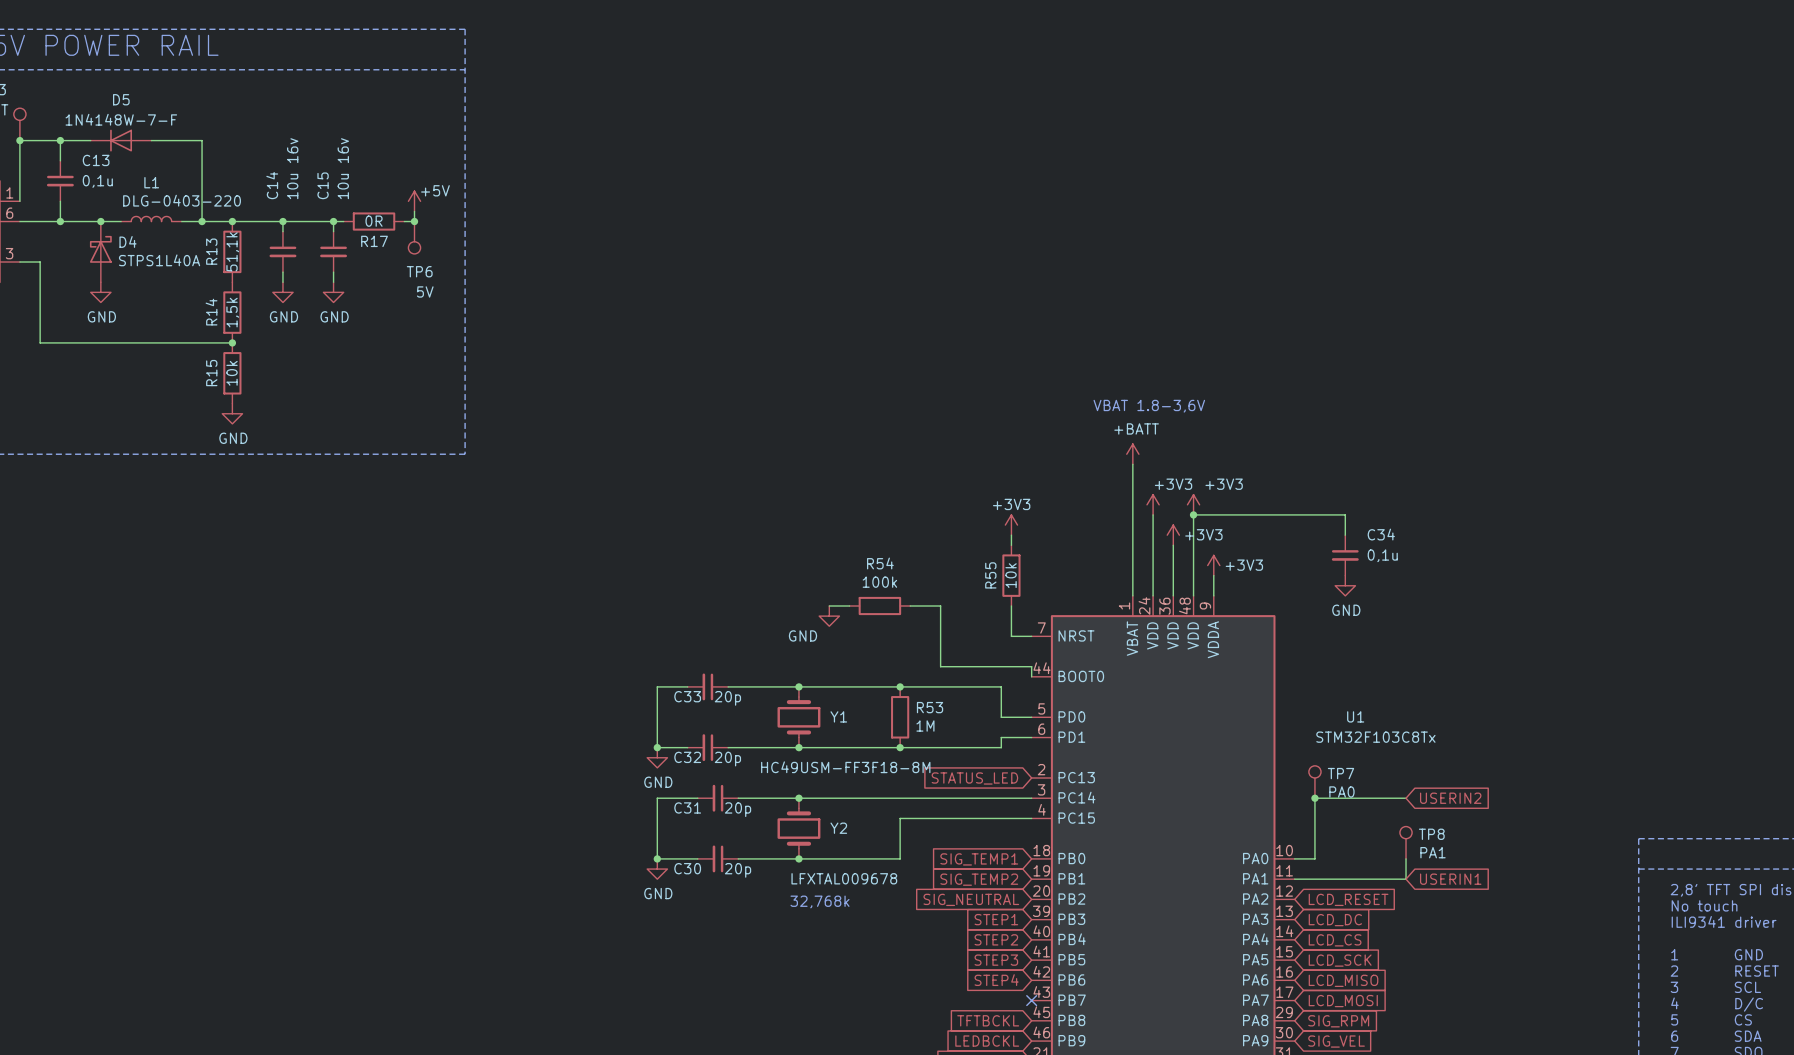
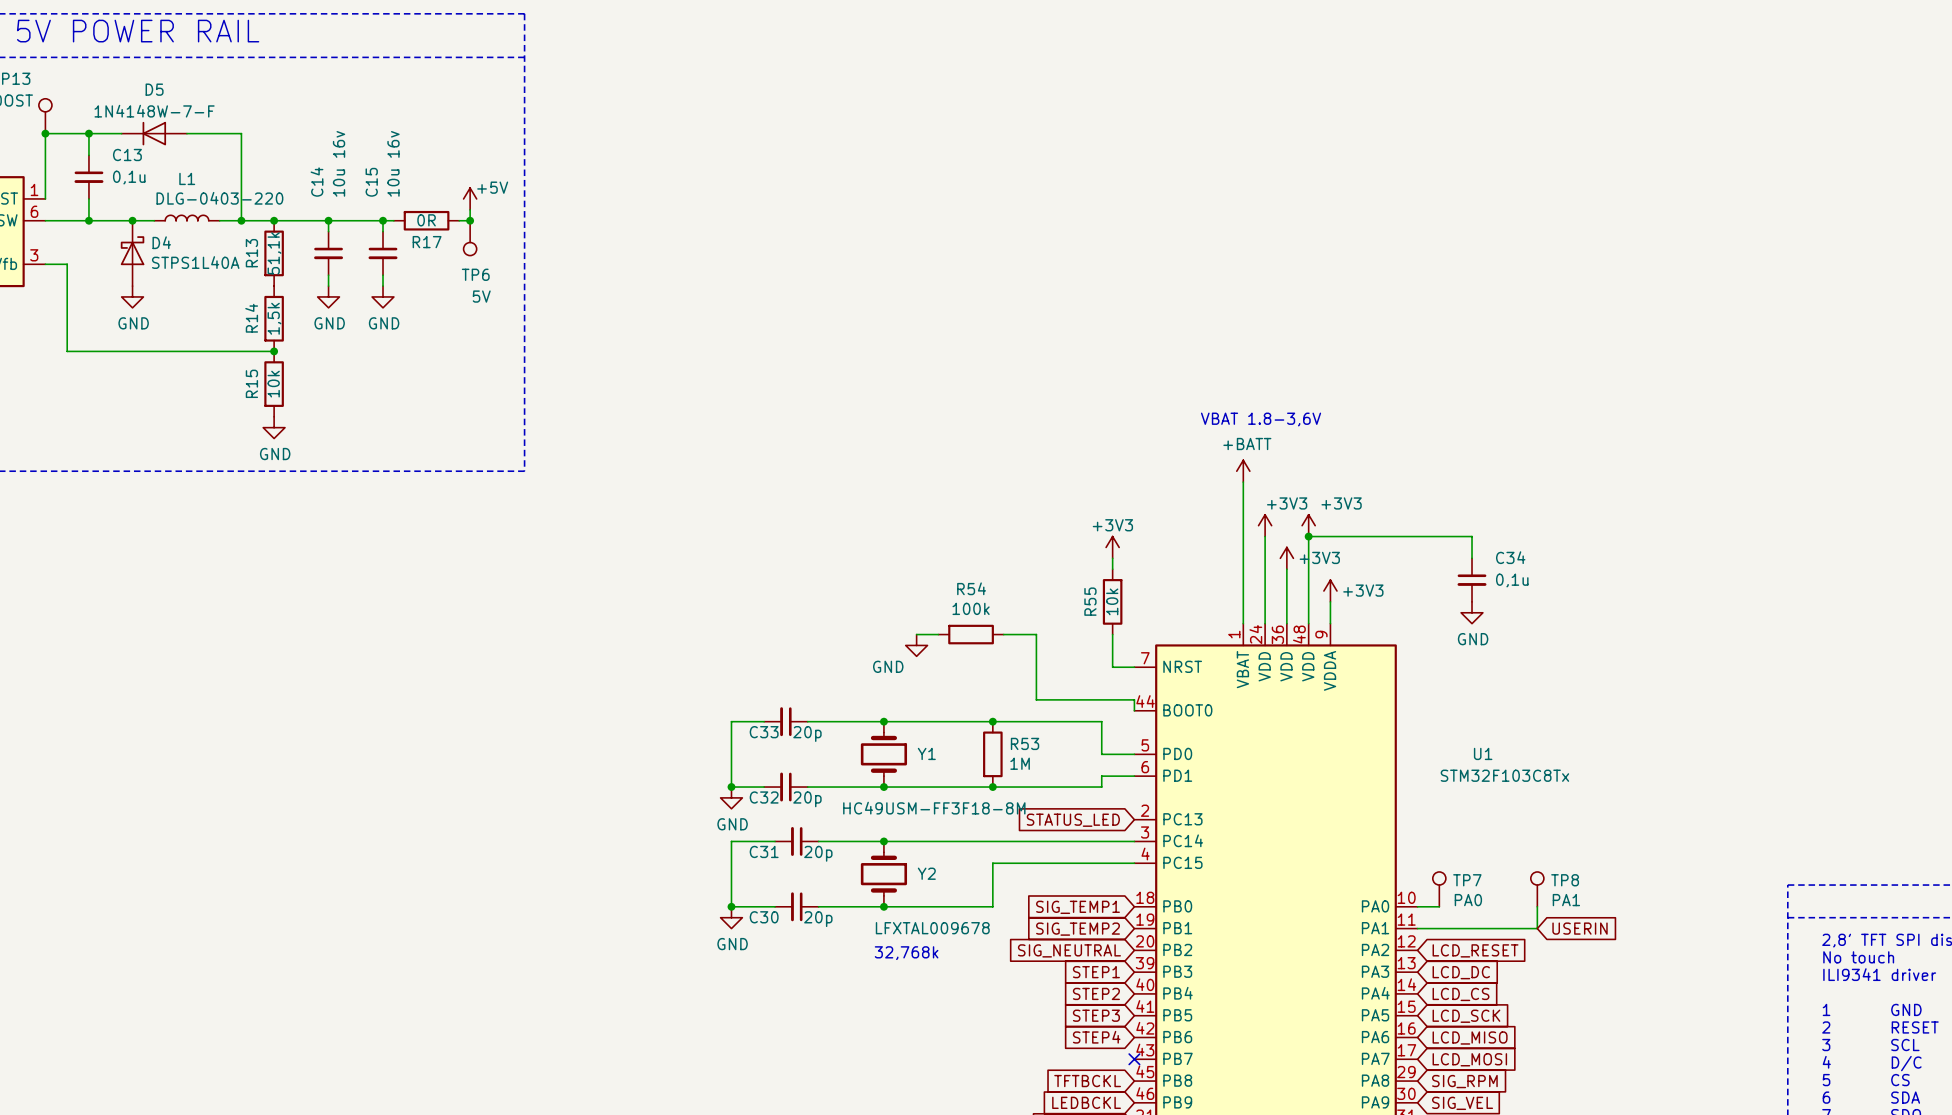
TP7 position: (1314, 782) -> (1439, 889)
junction: (1314, 798) -> none
wire: (1406, 798) (1314, 798) (1314, 858) -> none
global label: USERIN2 (1450, 798) -> none
global label: USERIN1 (1450, 879) -> USERIN (1580, 928)

